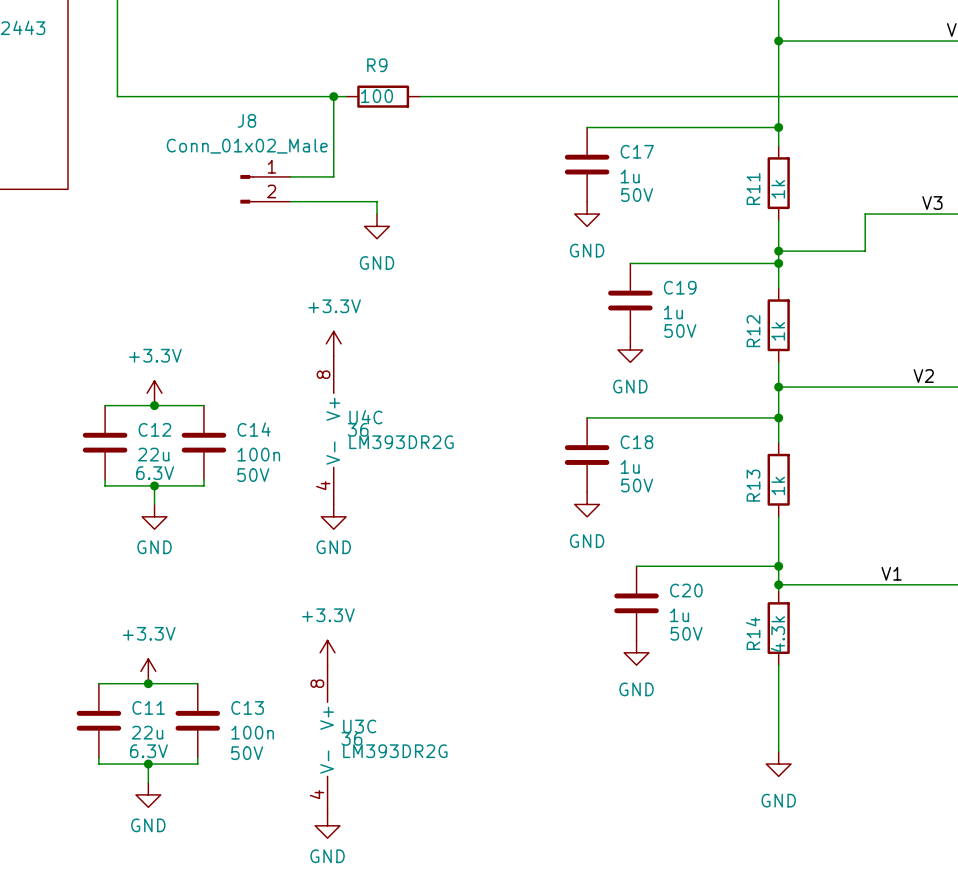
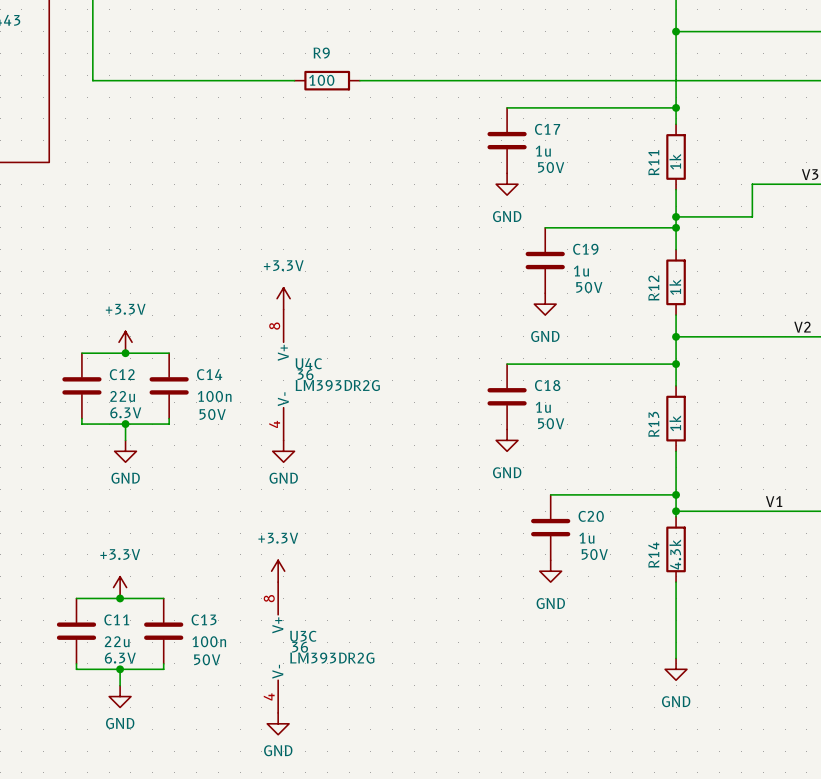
wire: (333, 96) (333, 176) (290, 176) -> none
junction: (333, 96) -> none
J8: Conn_01x02_Male (265, 189) -> none
wire: (290, 201) (376, 201) (376, 214) -> none
power symbol: GND (376, 226) -> none

